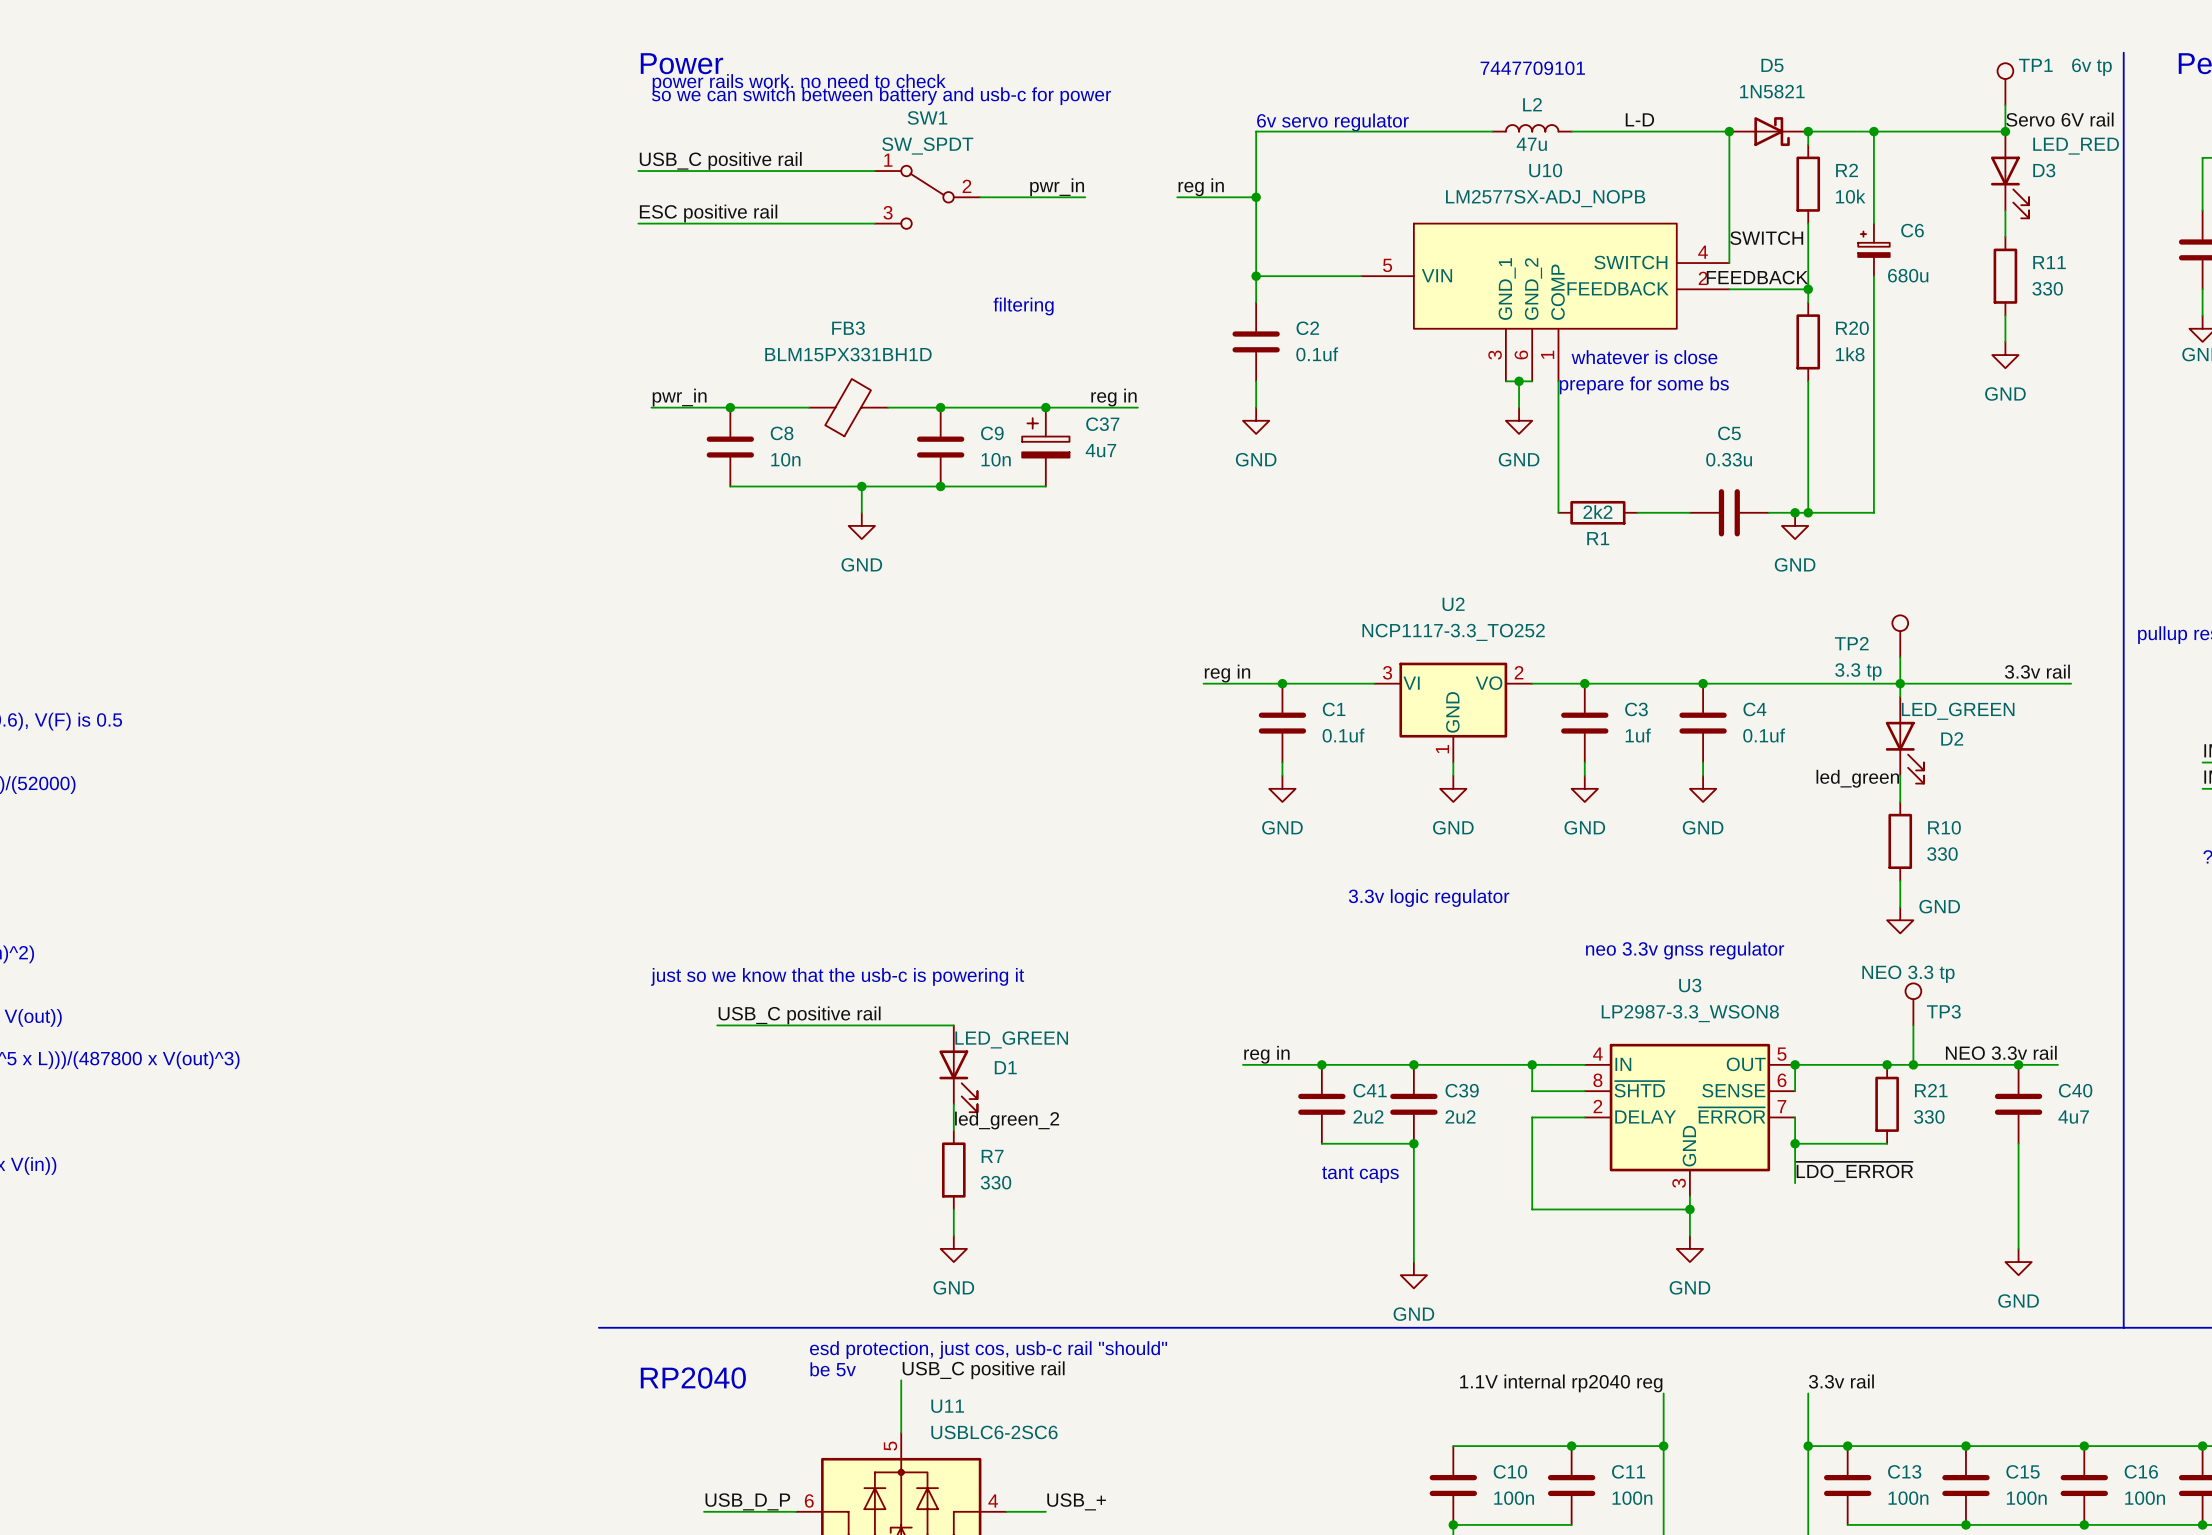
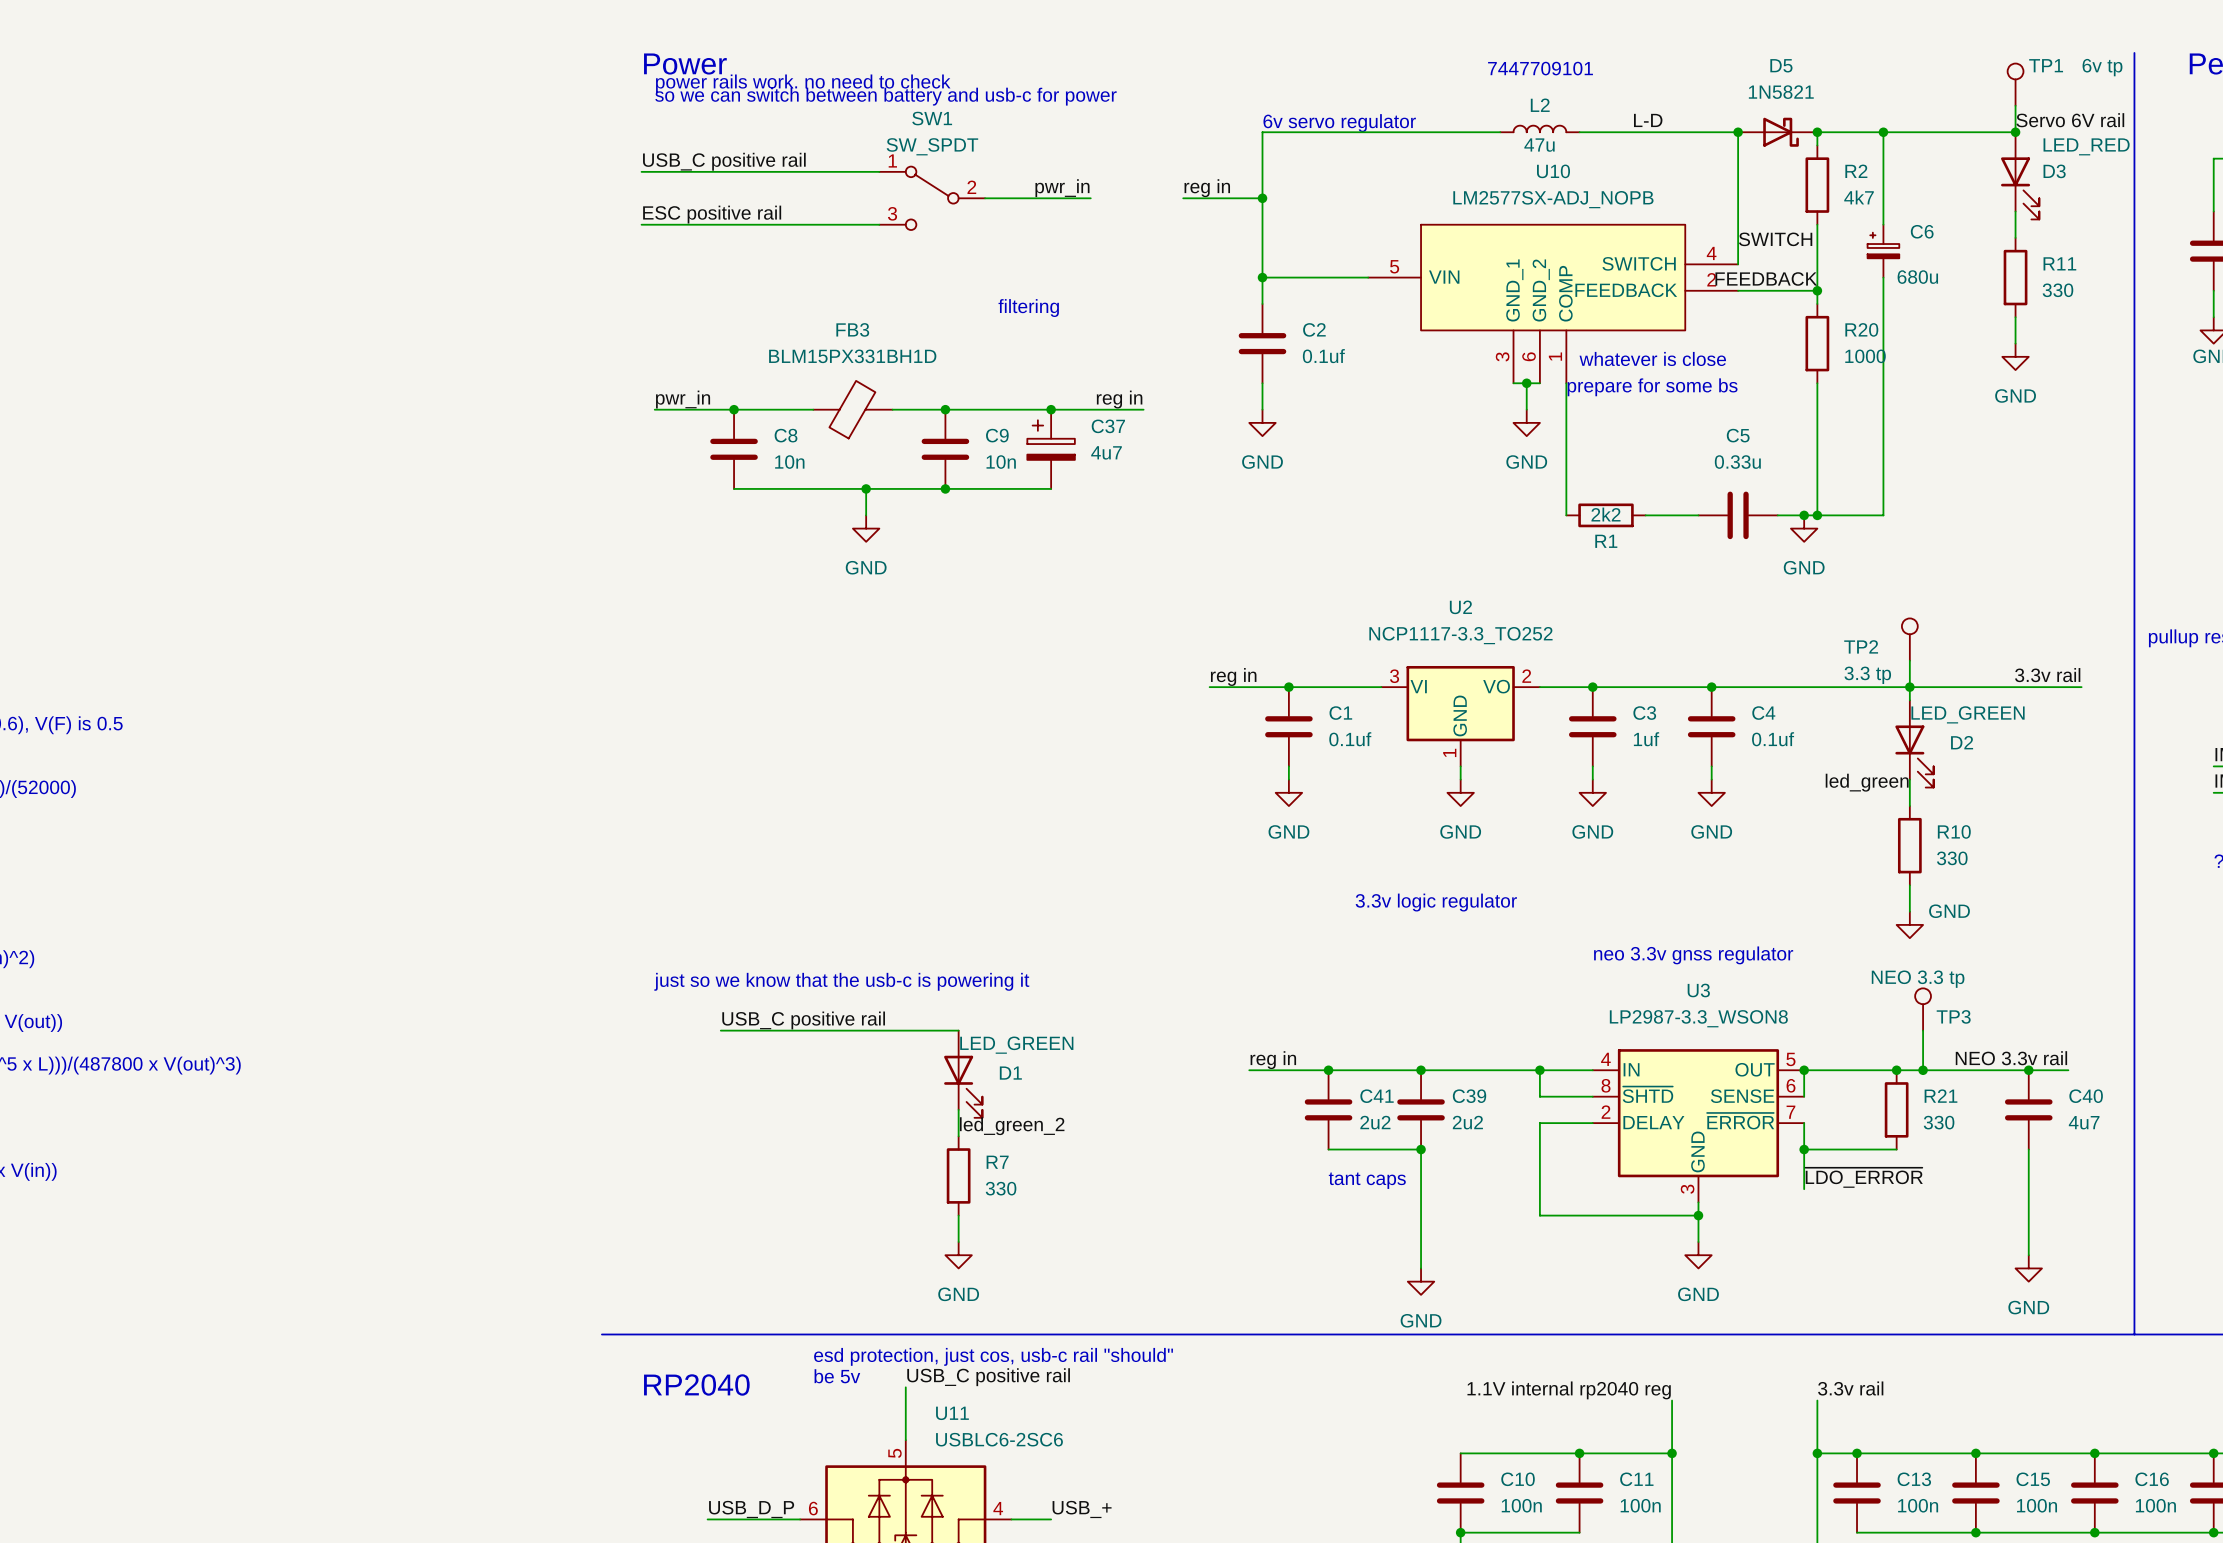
R2 value: 10k (1850, 196) -> 4k7 (1859, 197)
R20 value: 1k8 (1850, 354) -> 1000 (1865, 356)

